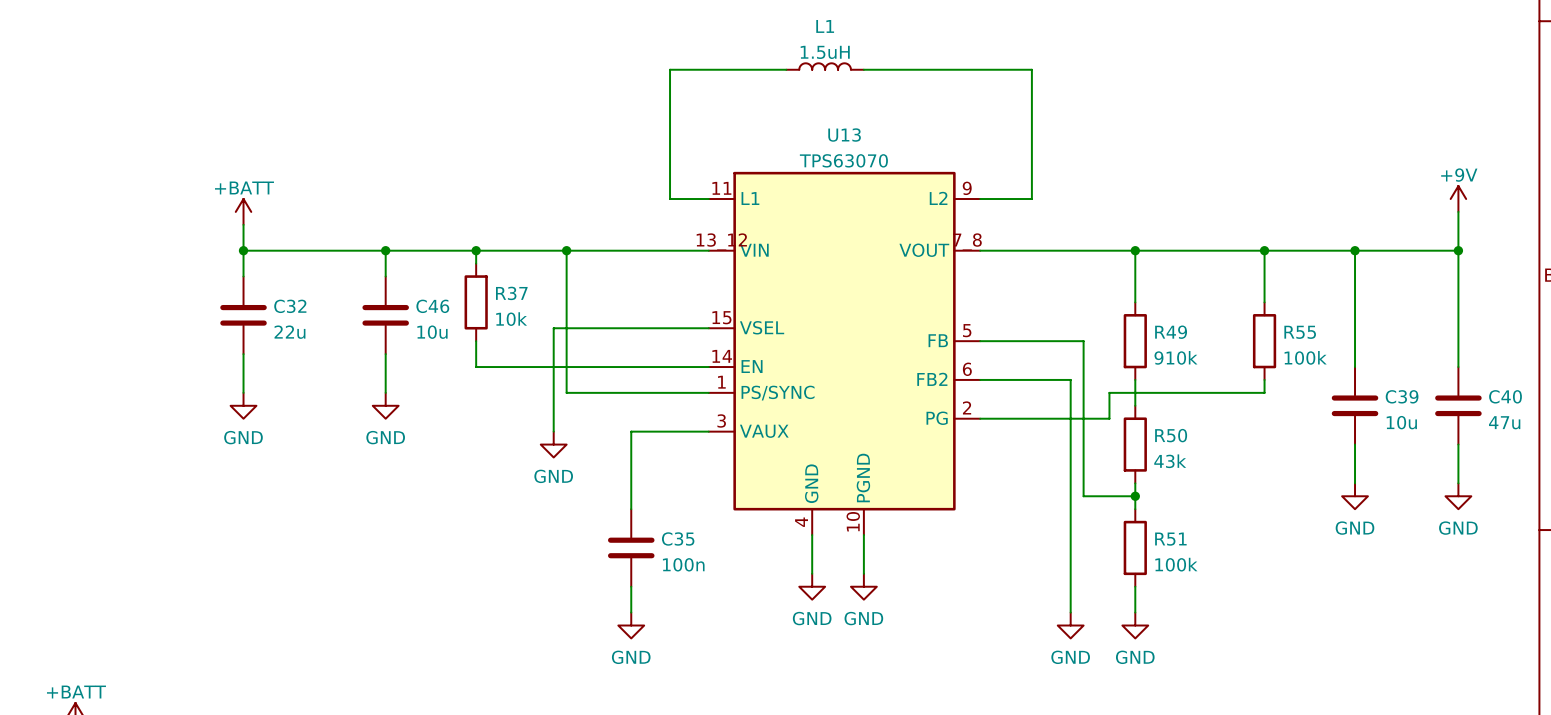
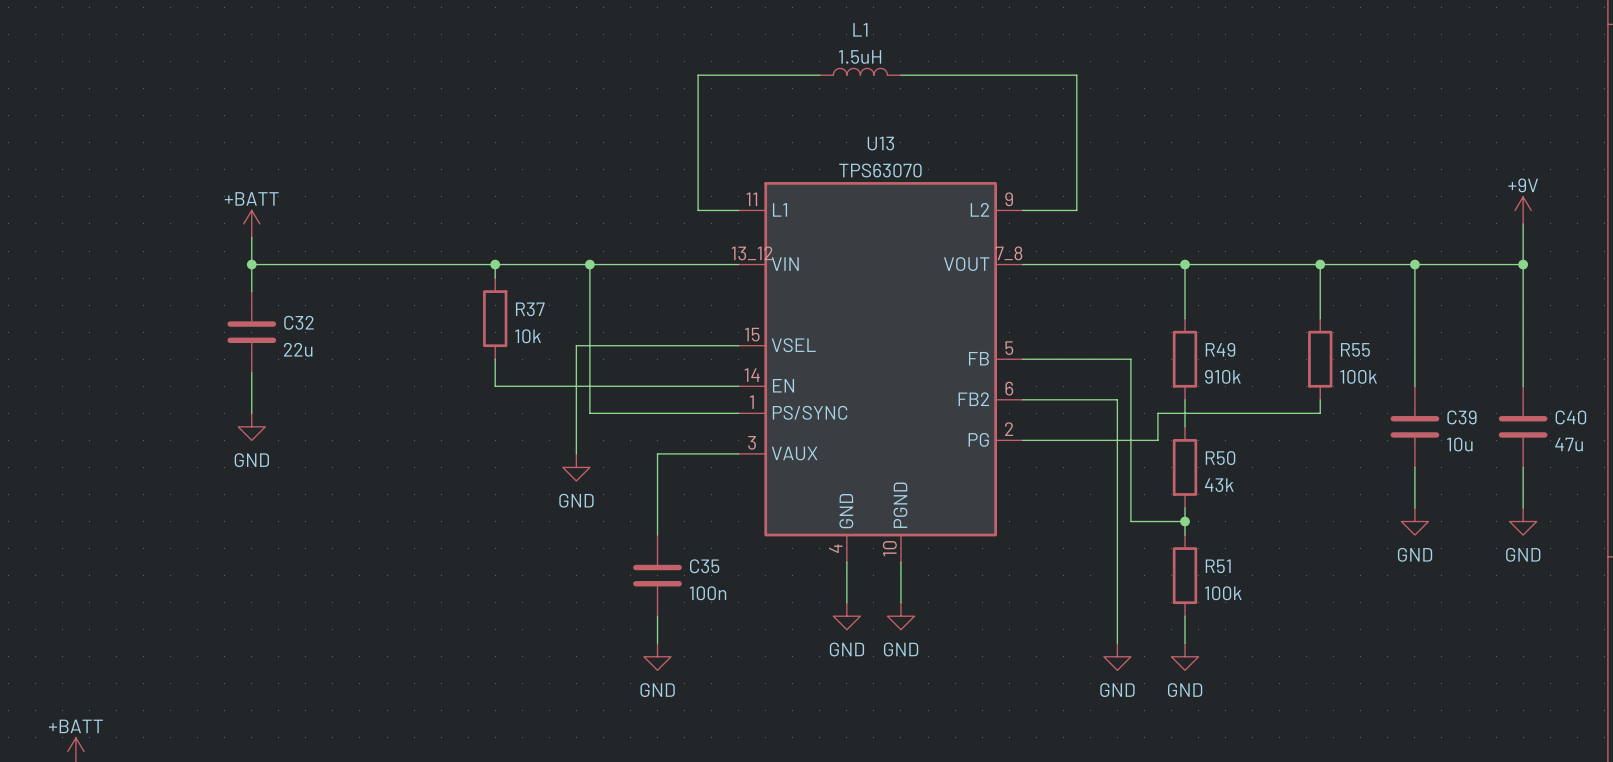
wire: (385, 250) (385, 276) -> none
junction: (385, 250) -> none
C46: 10u (385, 315) -> none
wire: (385, 354) (385, 392) -> none
power symbol: GND (385, 405) -> none

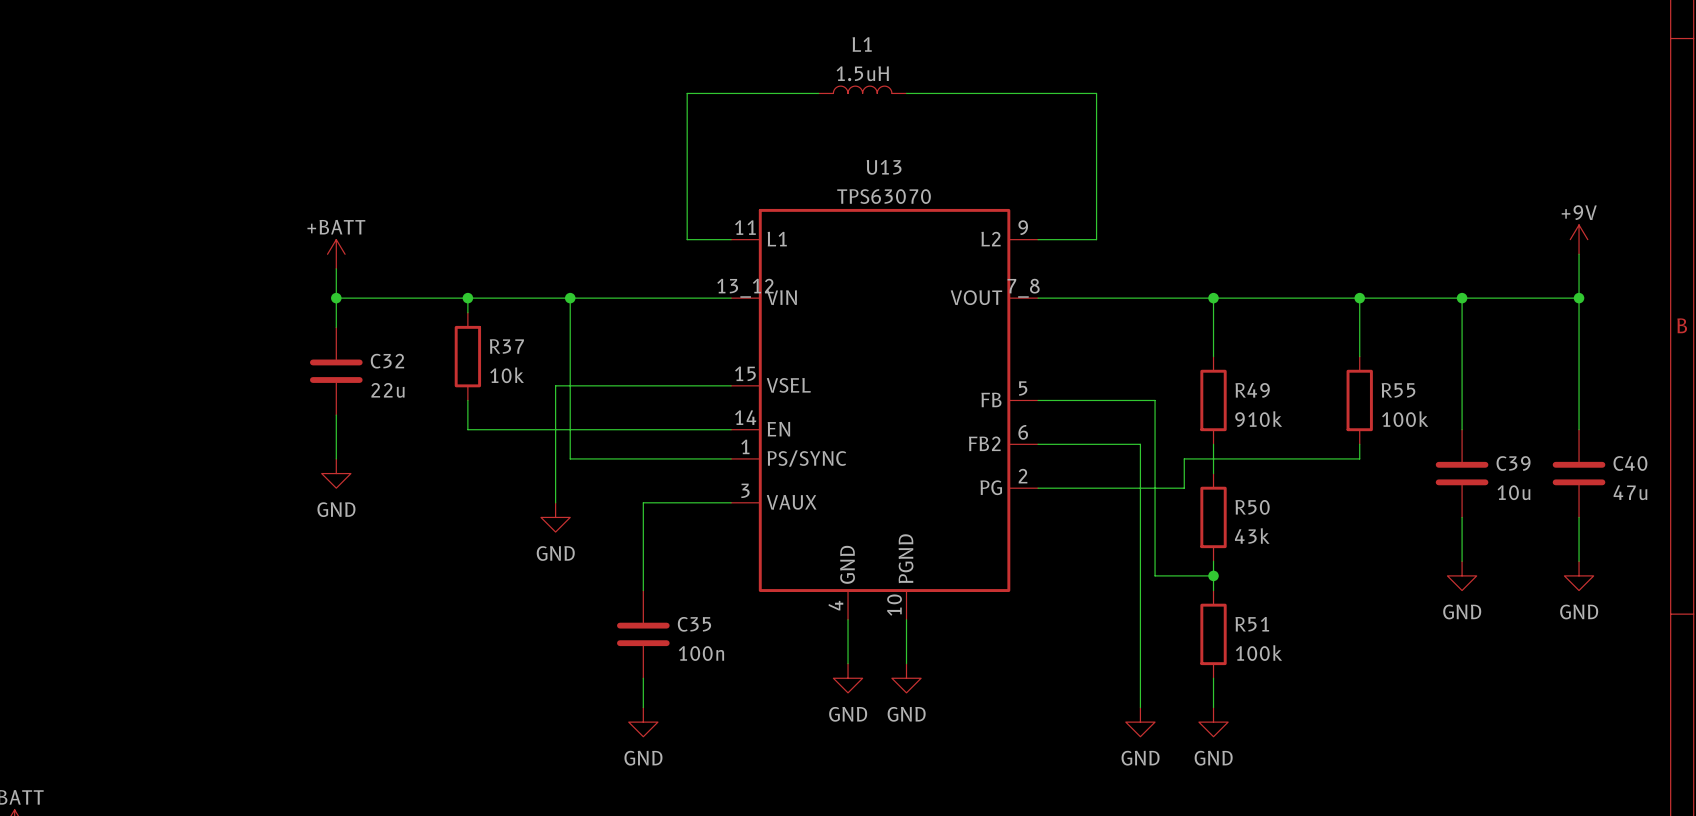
power symbol position: +BATT (251, 223) -> +BATT (336, 254)
wire: (251, 237) (251, 291) -> (336, 268) (336, 327)
wire: (251, 264) (373, 264) -> none
junction: (251, 264) -> none
junction: none -> (336, 298)
C32 position: (251, 332) -> (336, 371)
wire: (251, 372) (251, 413) -> (336, 415) (336, 458)
power symbol position: GND (251, 426) -> GND (336, 473)

